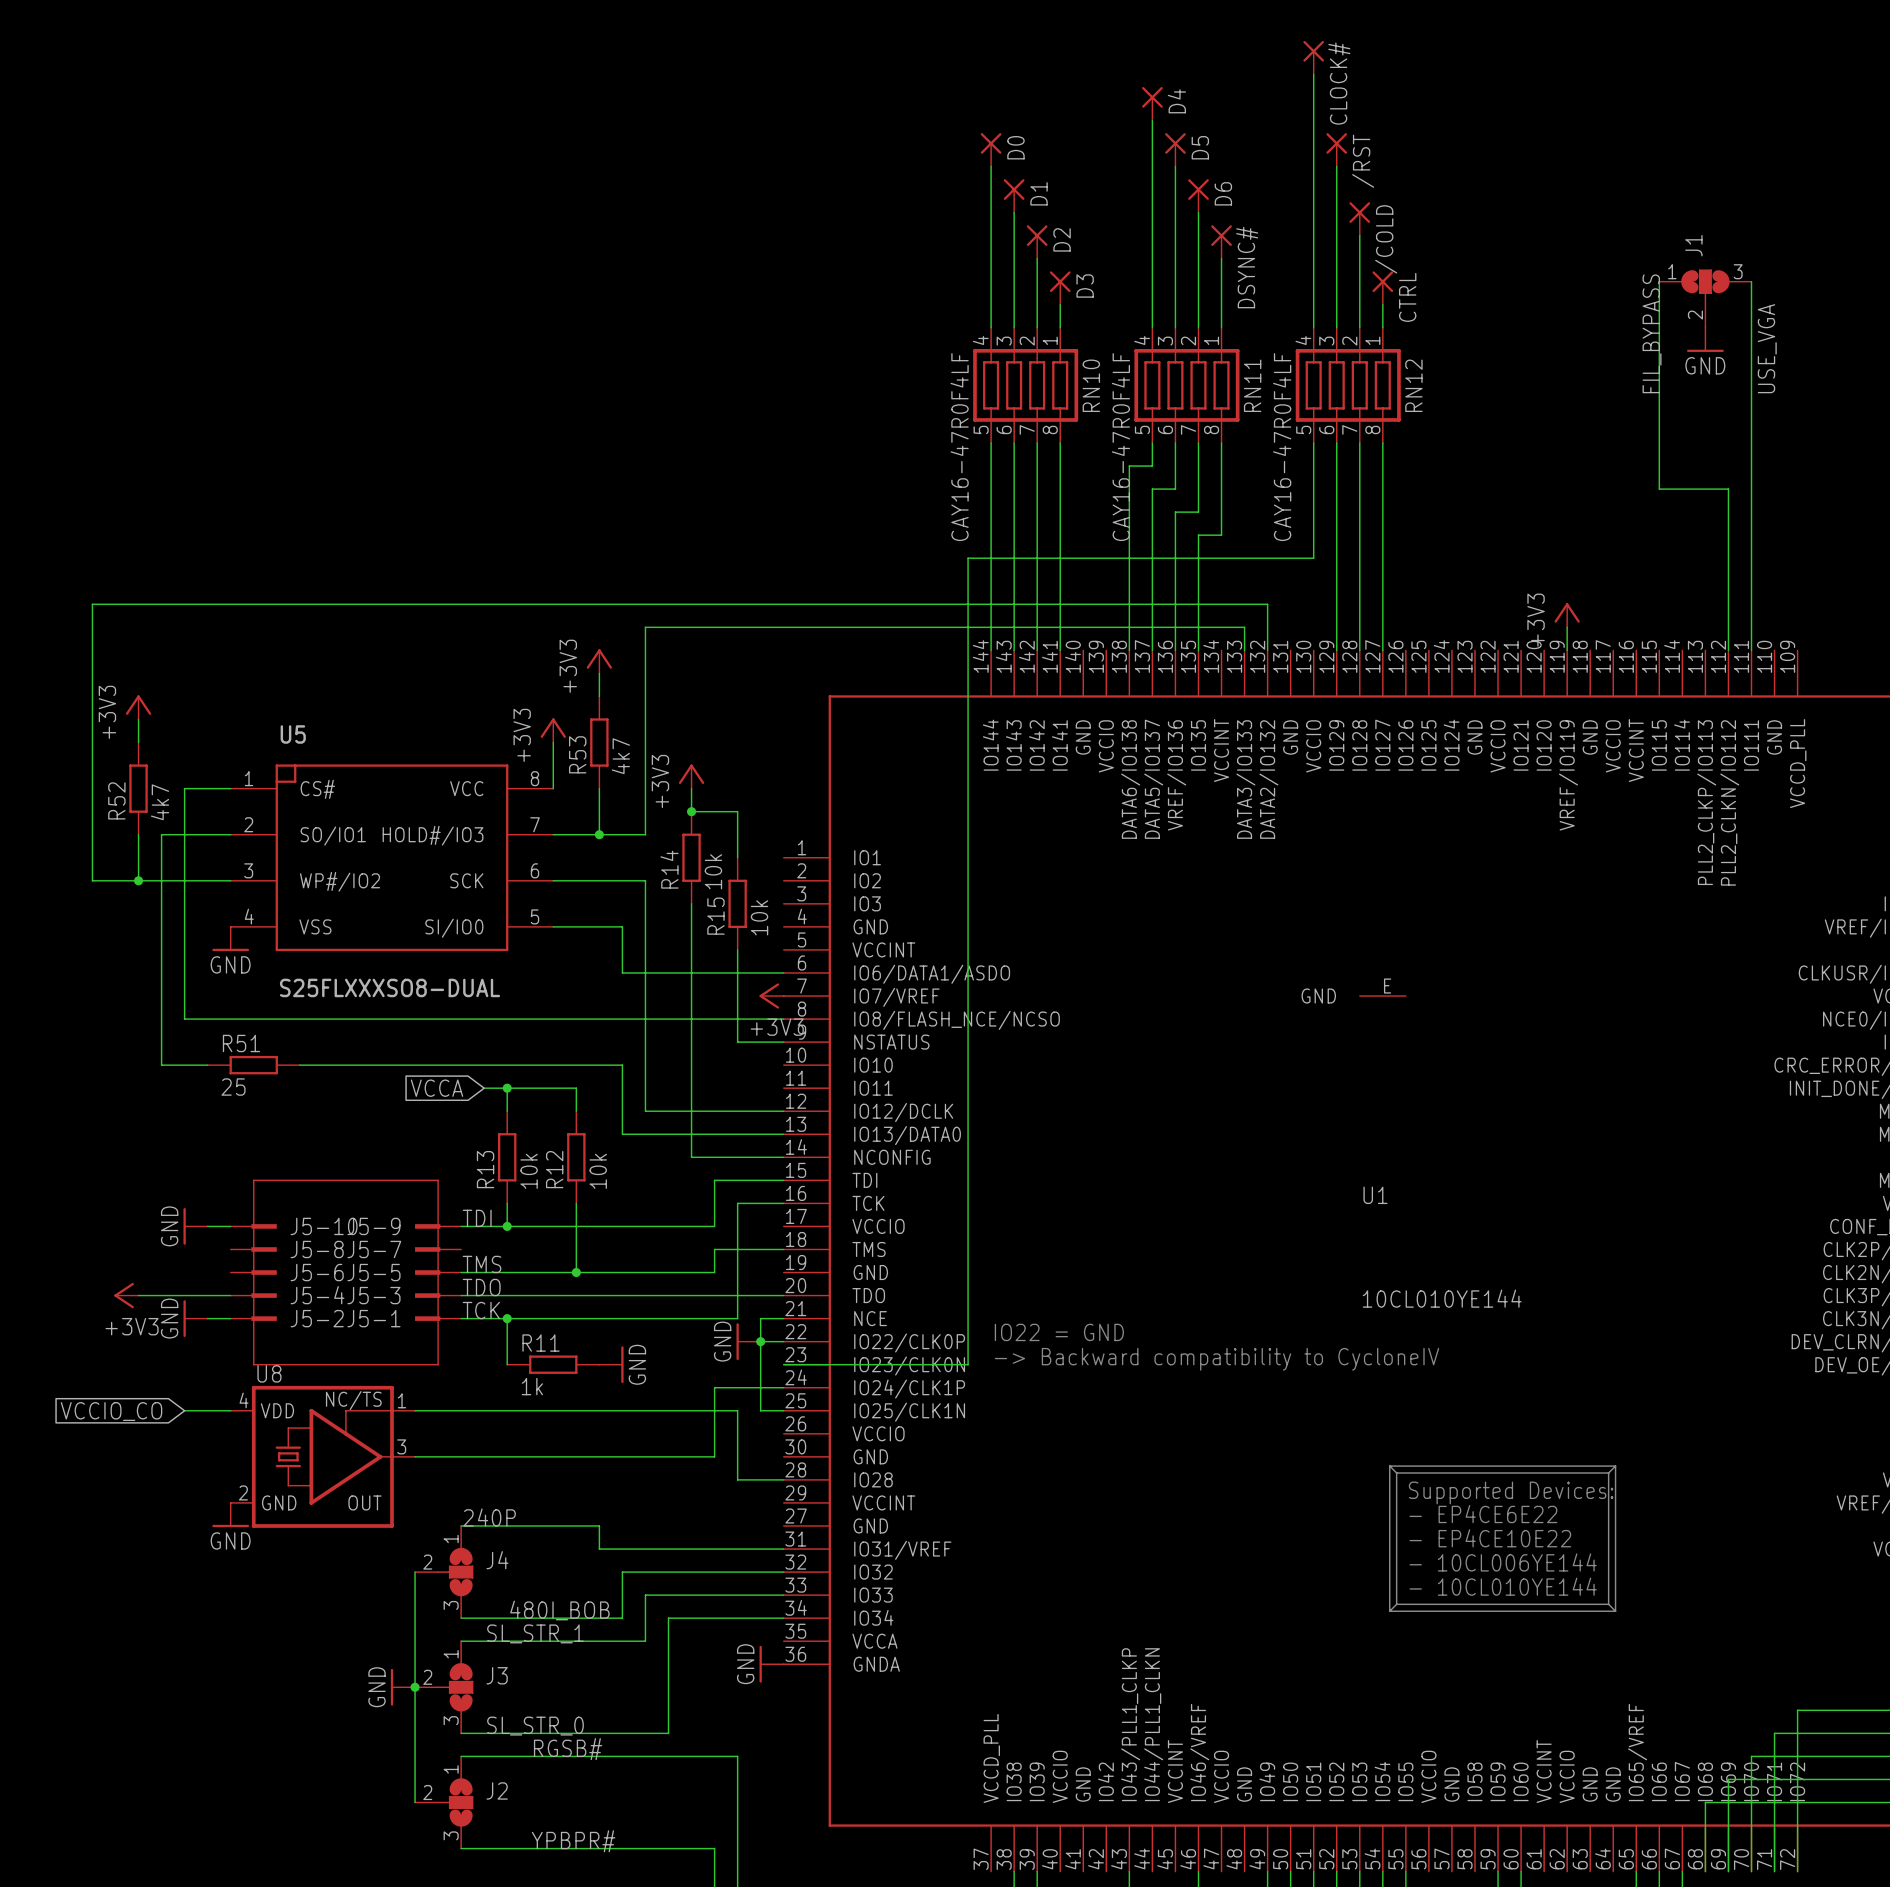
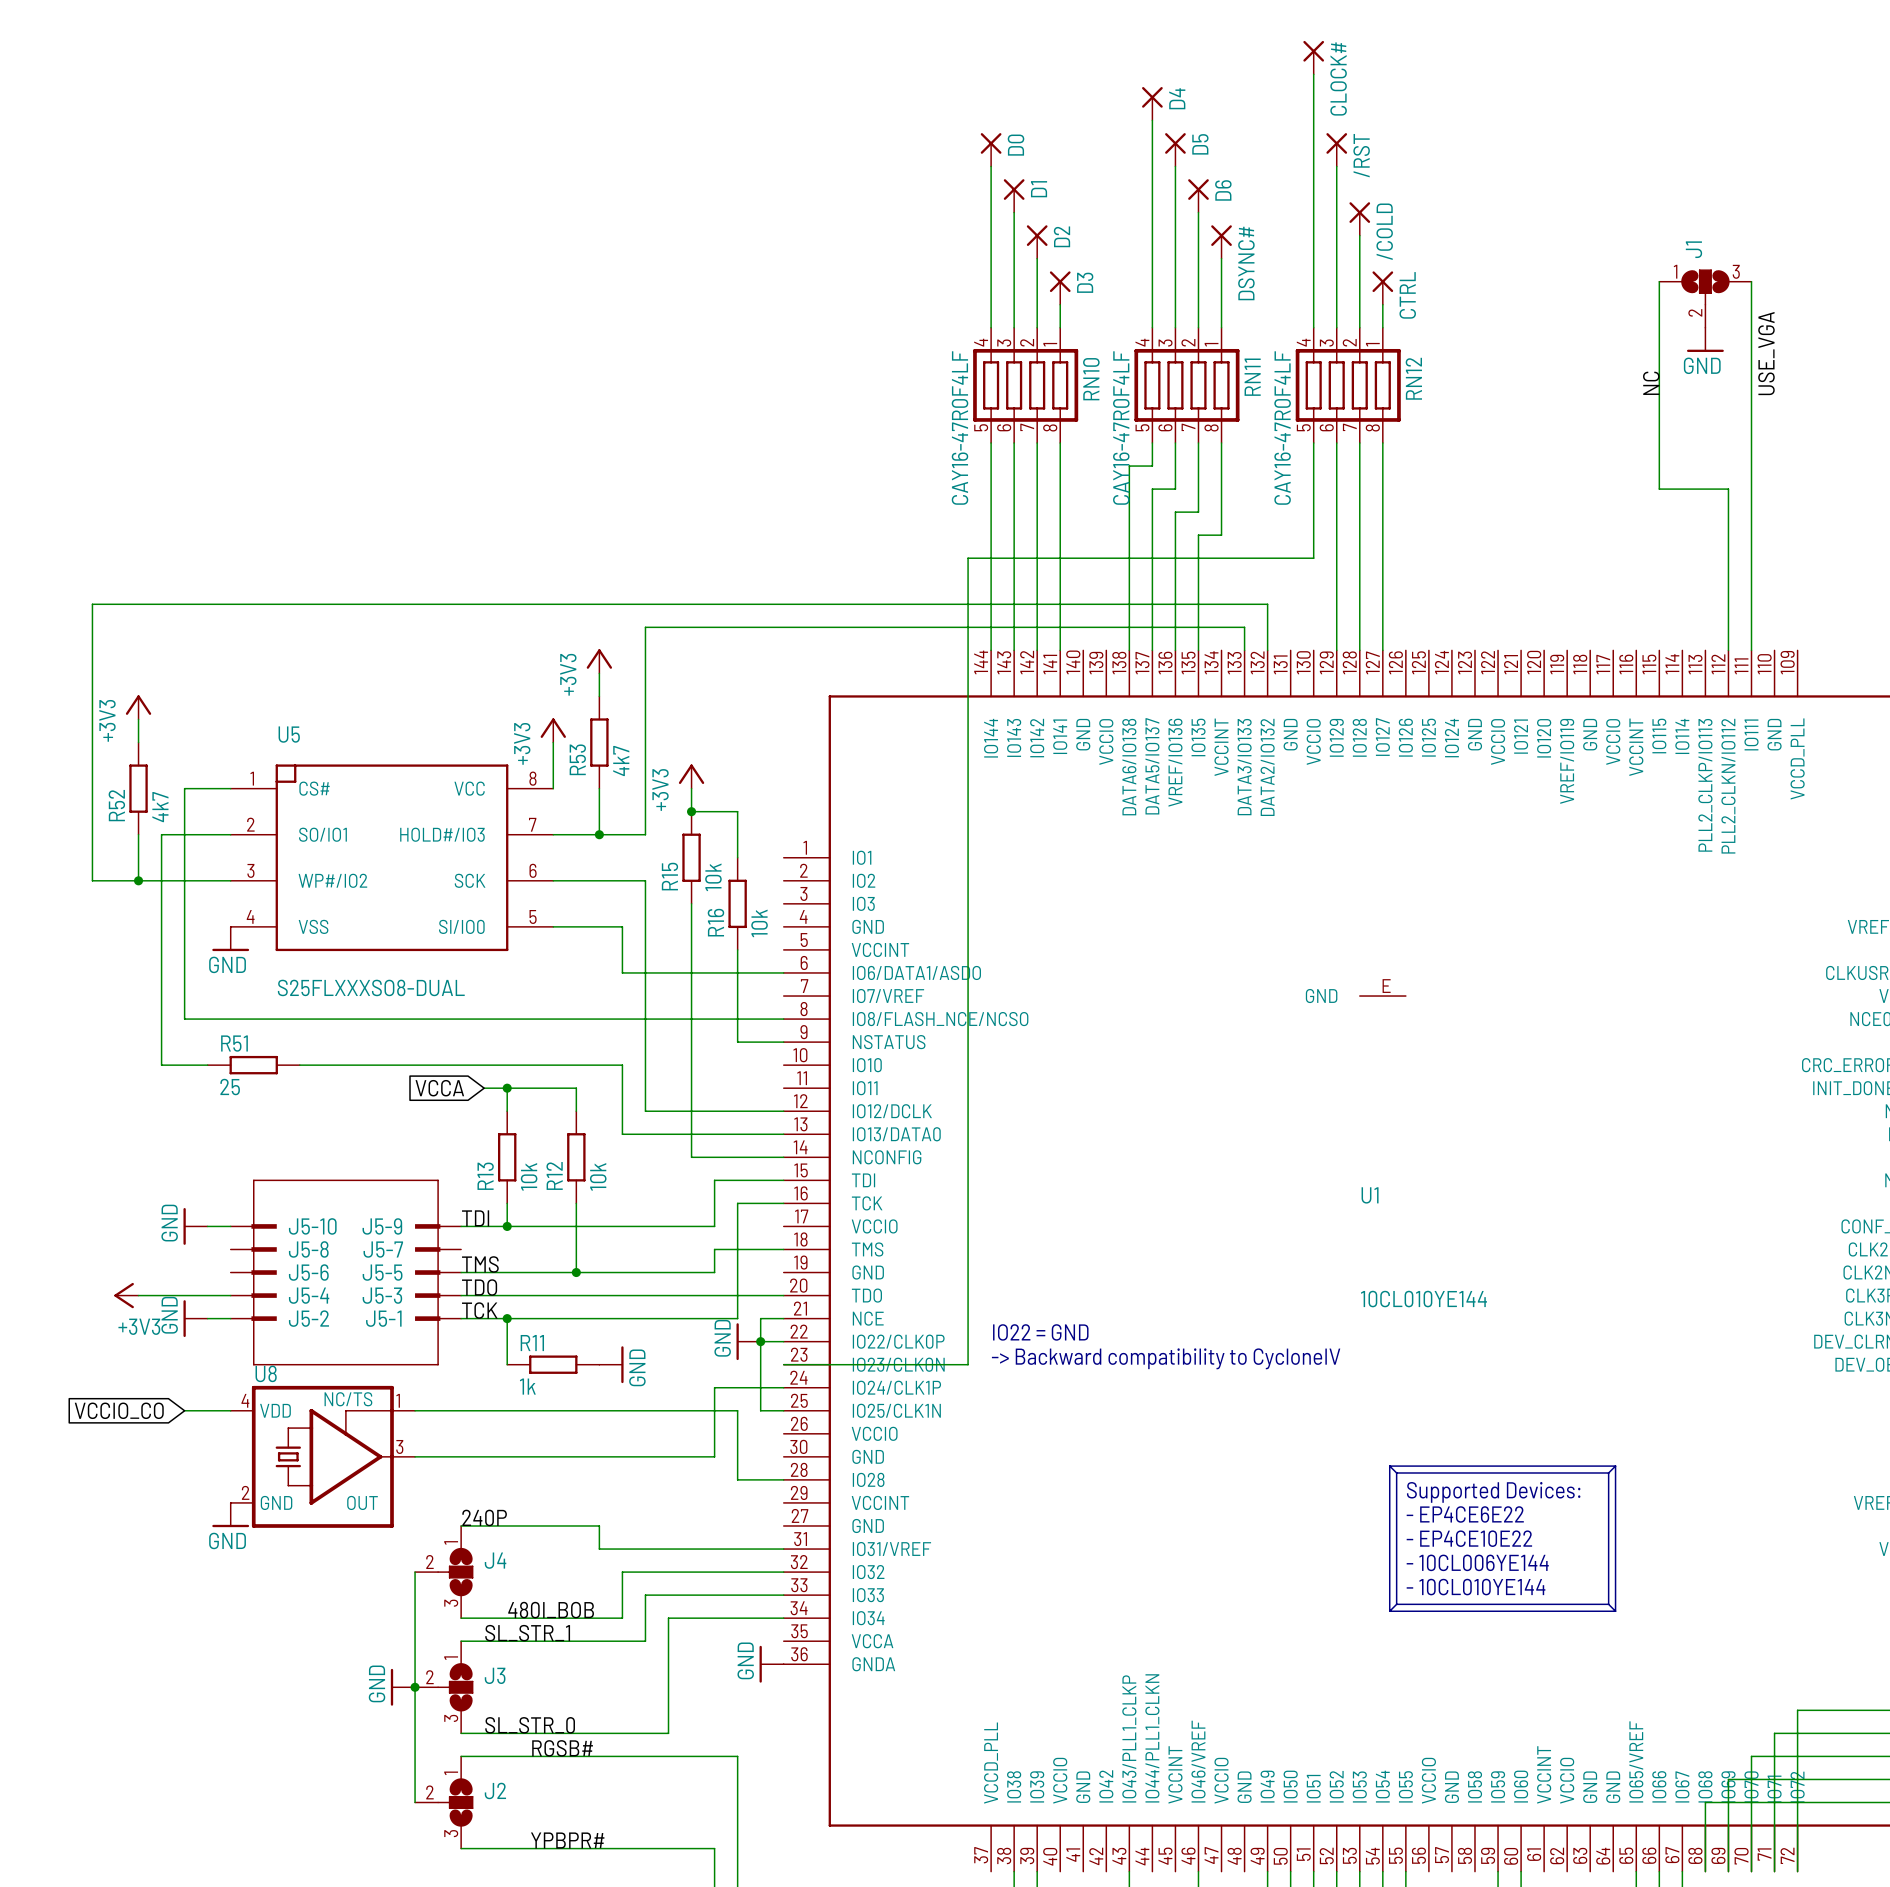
label: FIL_BYPASS (1652, 333) -> NC (1651, 383)
power symbol: +3V3 (1567, 615) -> none
wire: (1567, 627) (1567, 650) -> none
R14 name: R14 (669, 869) -> R15 (669, 876)
R15 name: R15 (715, 916) -> R16 (715, 922)
power symbol: +3V3 (771, 996) -> none

